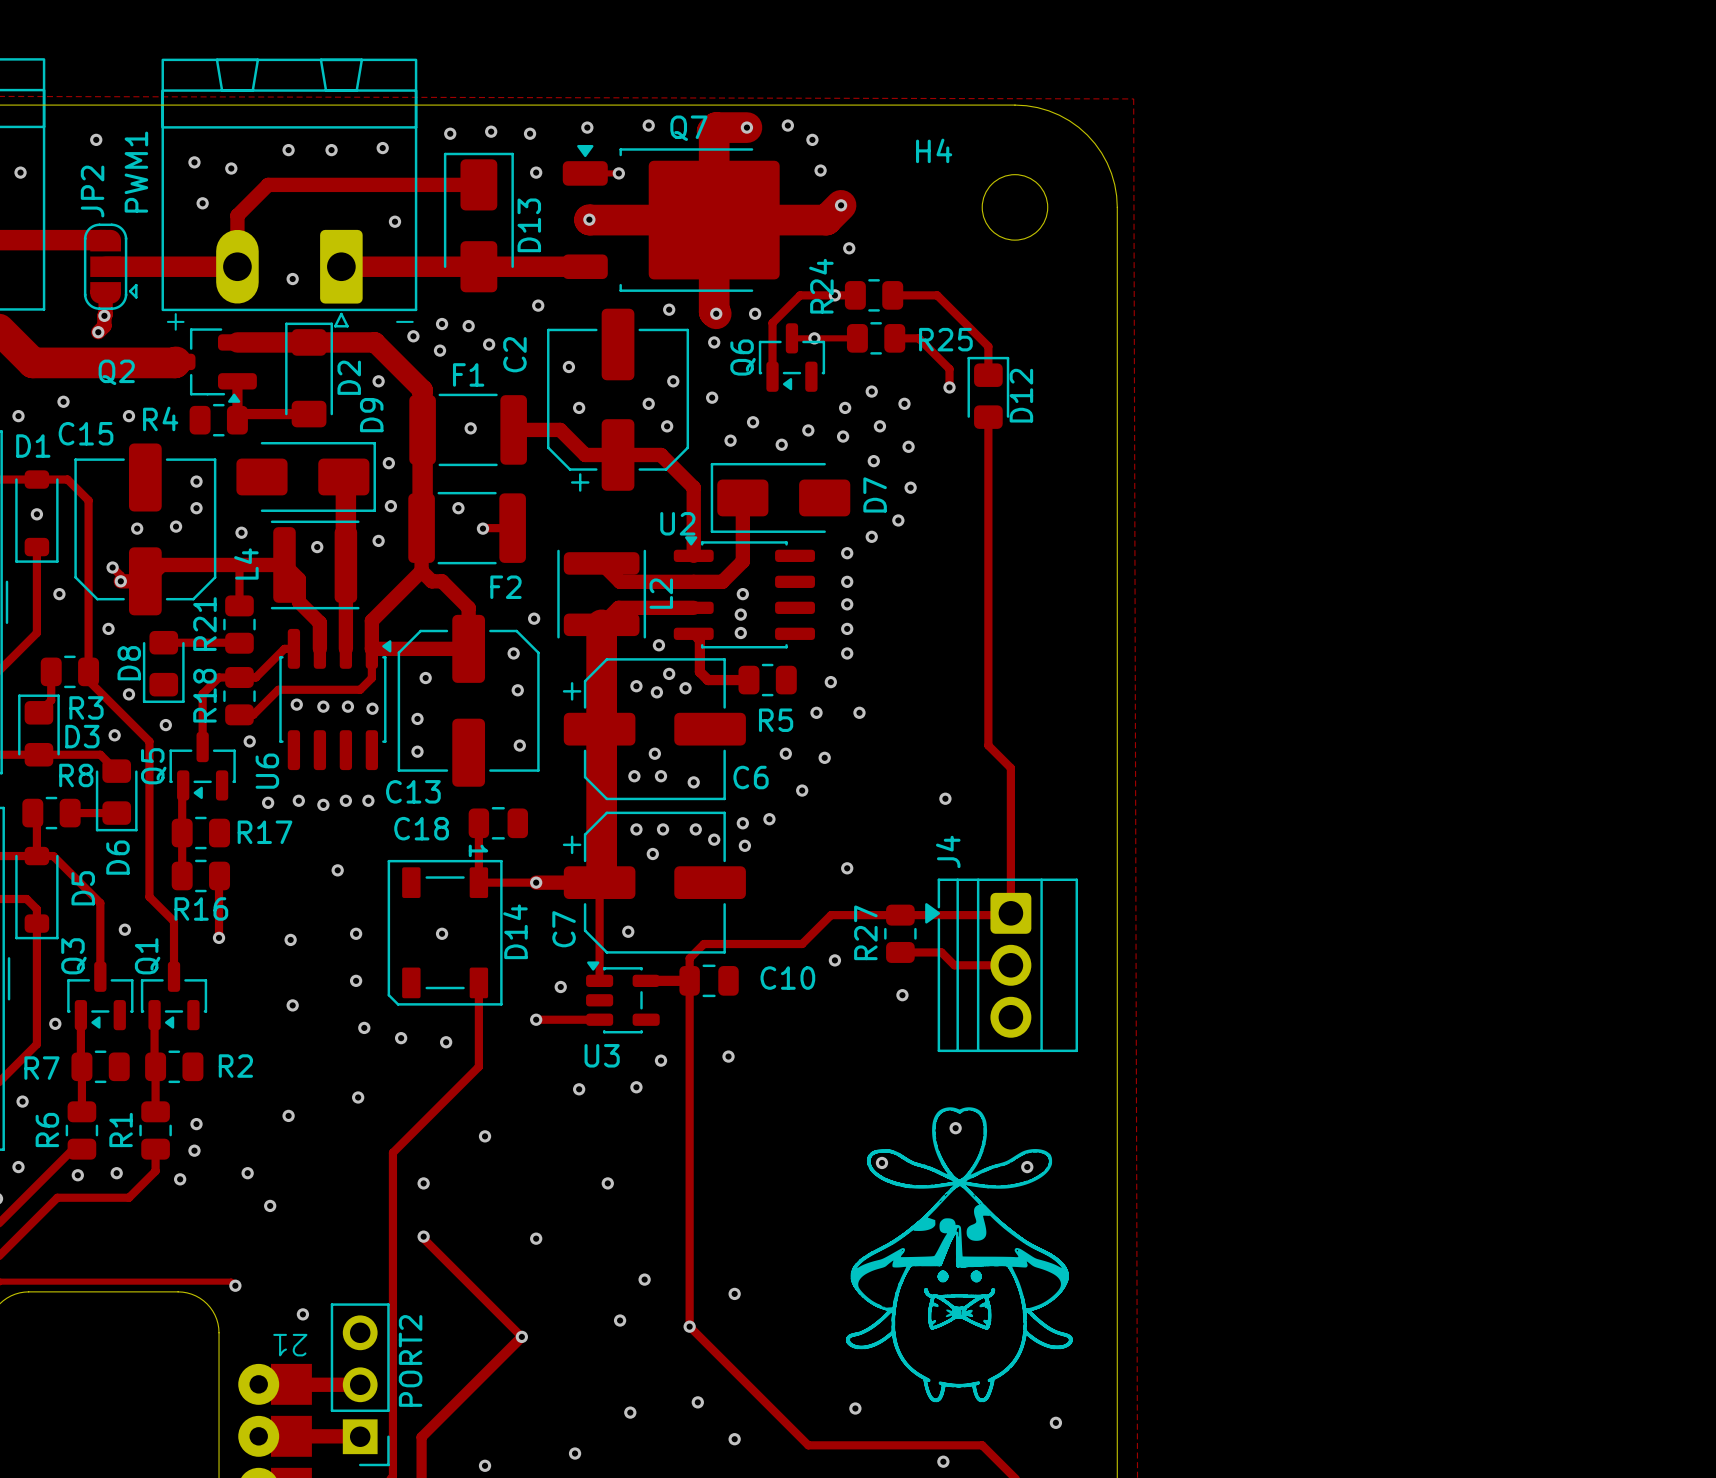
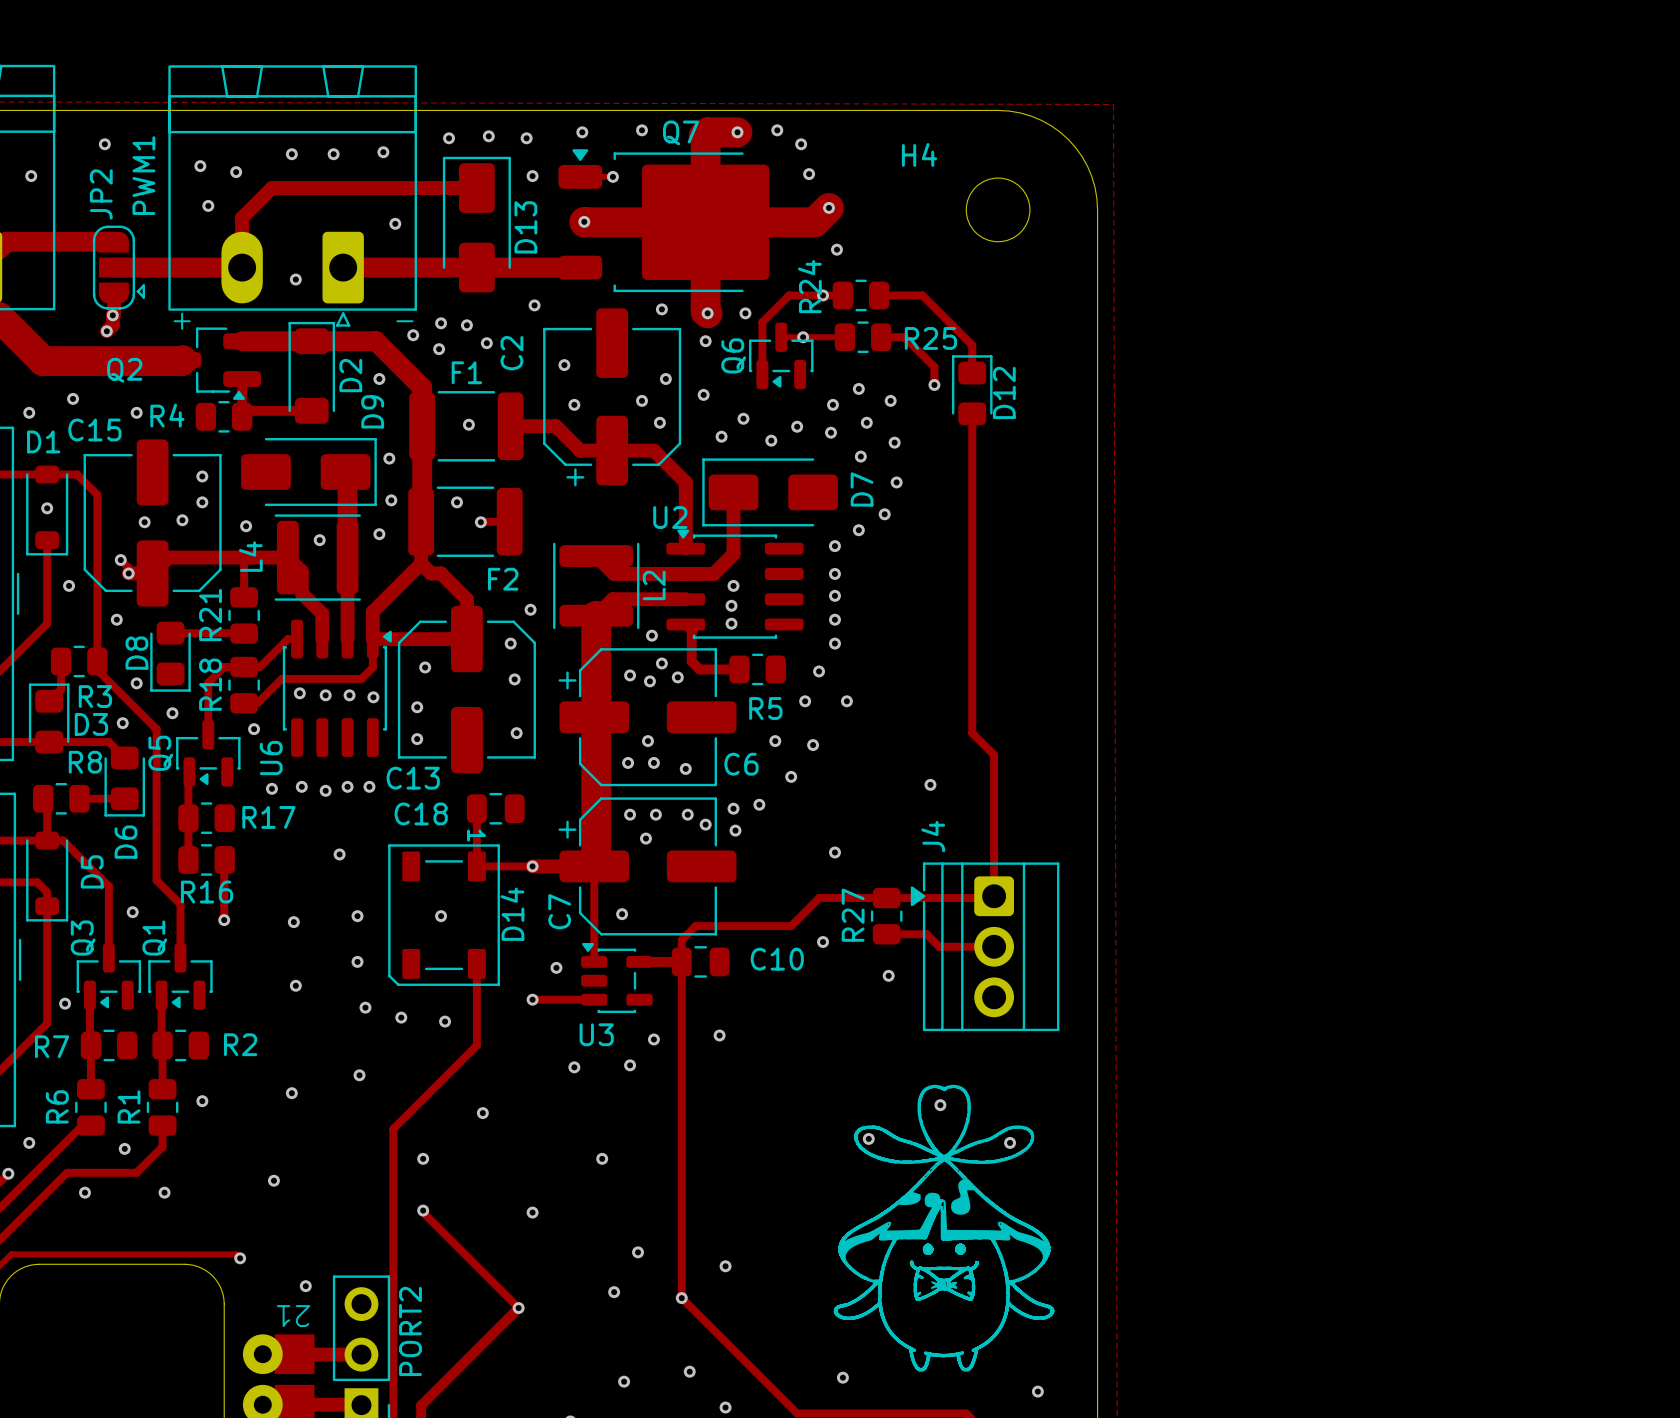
via: (22, 1101) -> none
via: (194, 1150) -> none
via: (247, 1173) -> none
via position: (77, 1175) -> (84, 1192)
via: (180, 1179) -> none
via: none -> (164, 1192)

